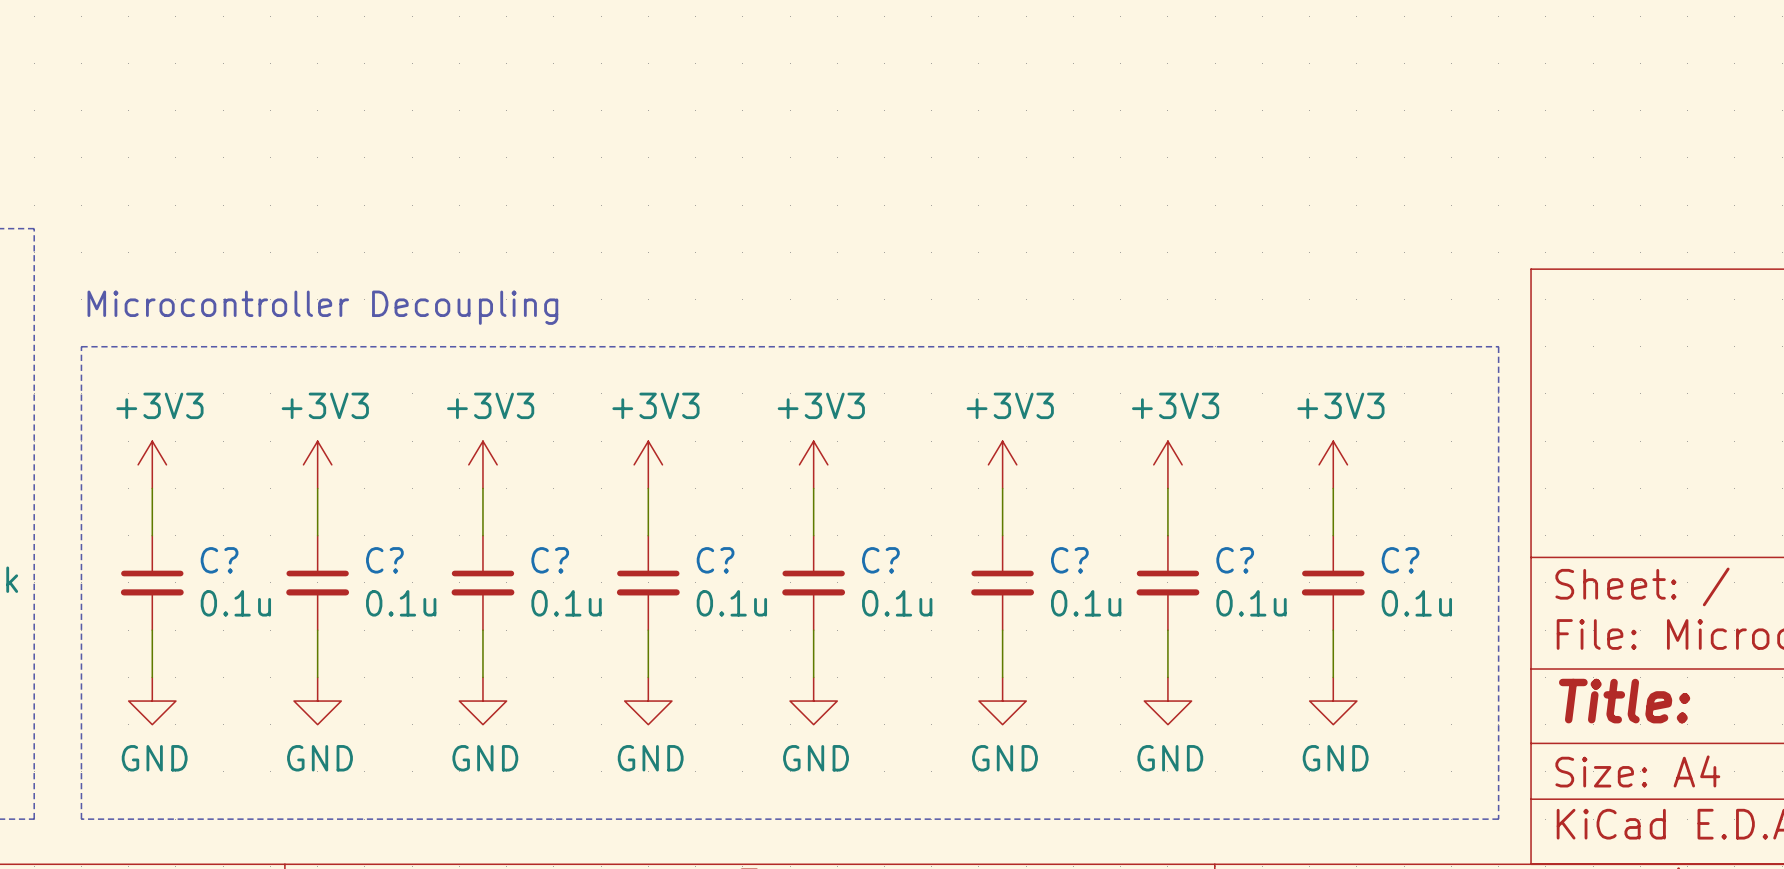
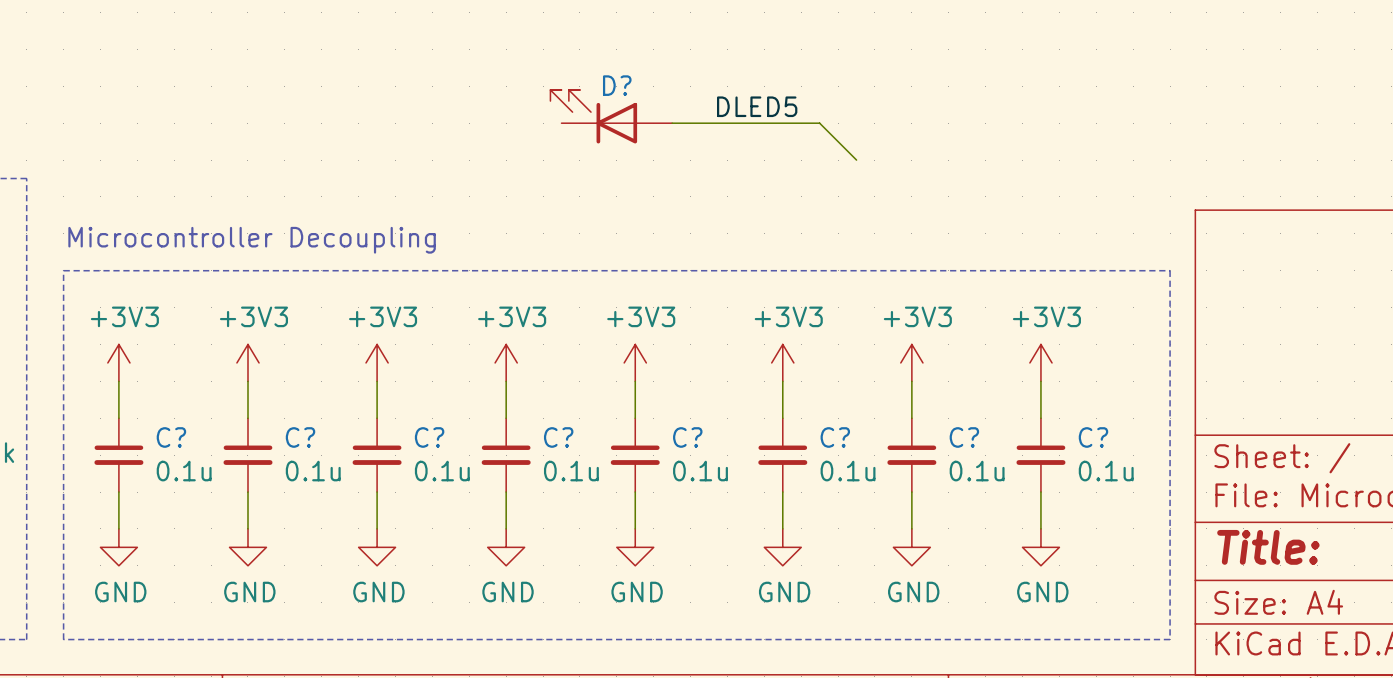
label: none -> DLED5 (757, 106)
D?: none -> (611, 116)
wire: none -> (672, 123) (819, 123) (856, 160)

